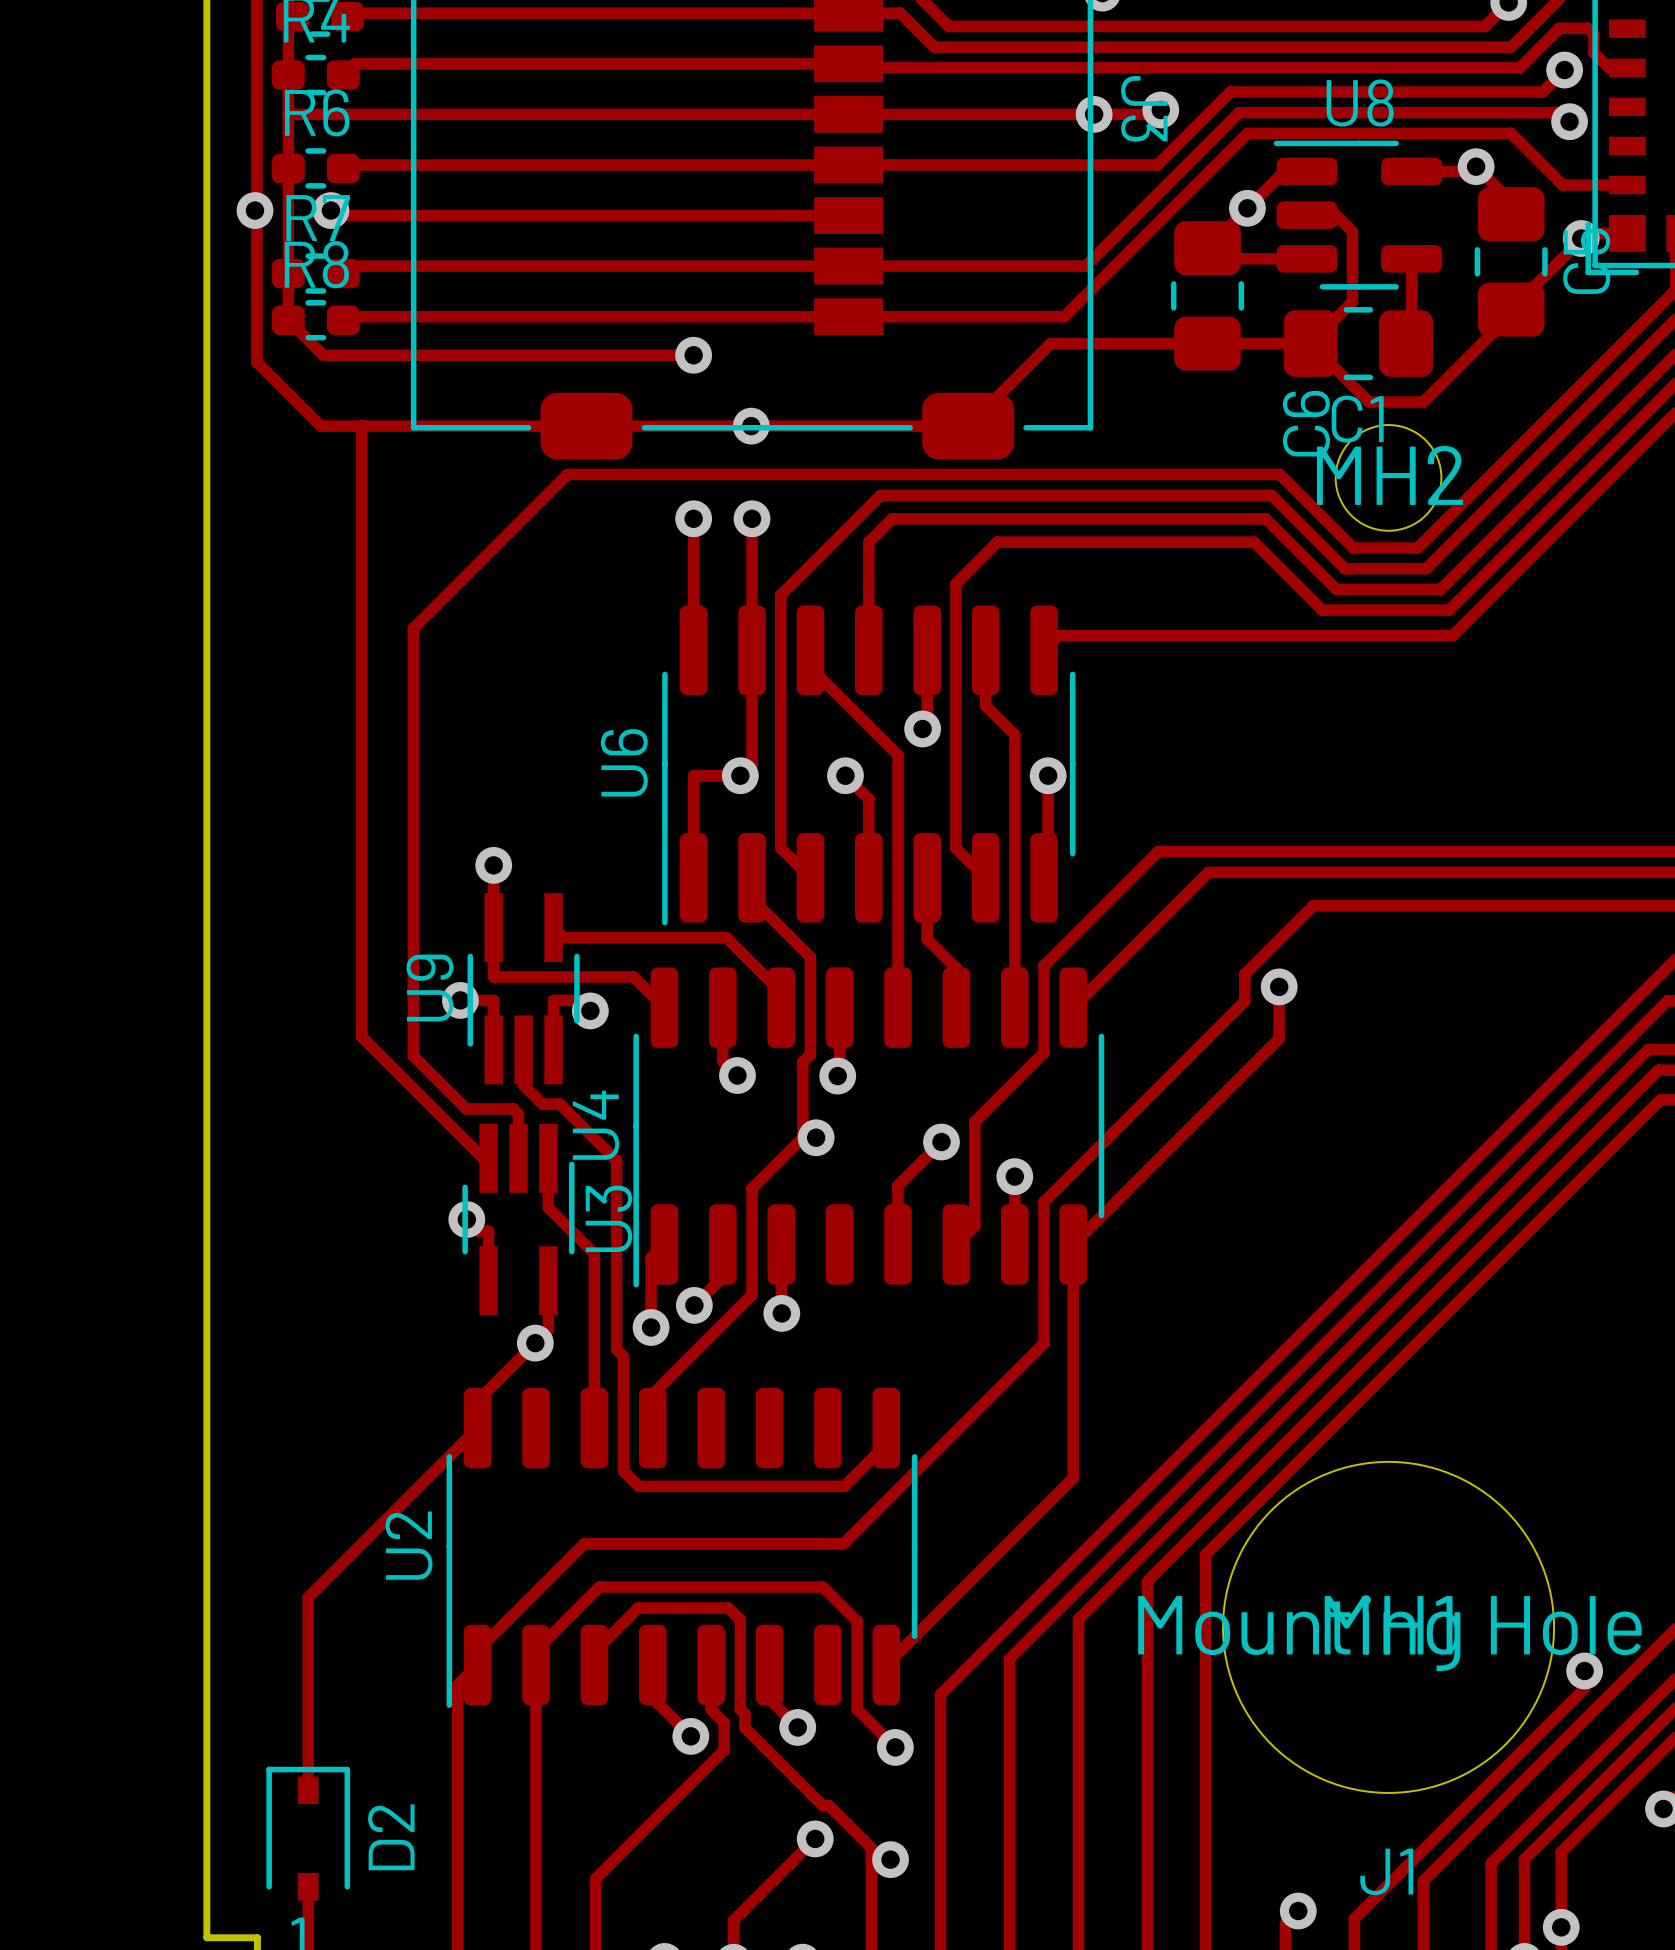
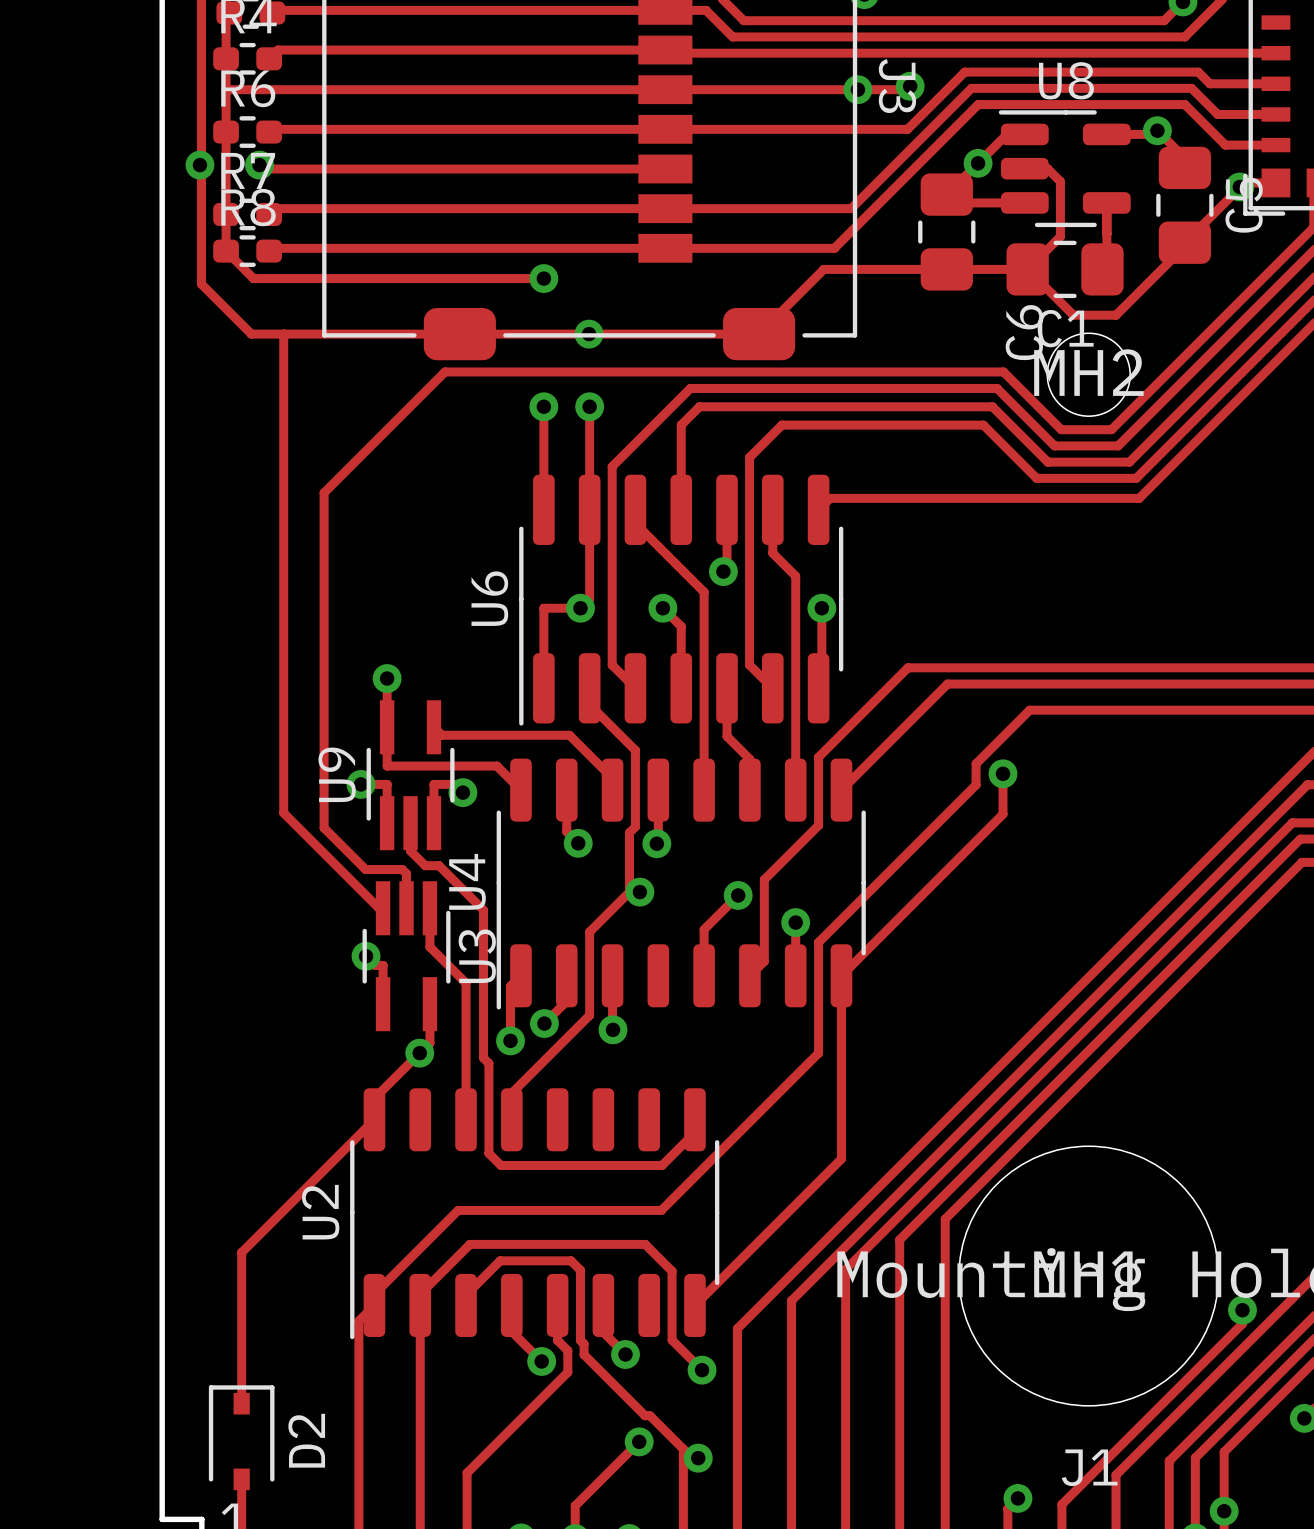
track: (1519, 67) (1559, 28) (1587, 28) (1593, 34) (1593, 52) (1608, 67) -> (1191, 53) (1261, 53)
track: (1564, 70) (1542, 91) (1528, 91) -> (1275, 83) (1210, 83) (1198, 72)
via: (1564, 70) -> none
track: (1519, 112) (1560, 112) (1569, 121) -> (1191, 88) (1217, 114) (1275, 114)
via: (1569, 121) -> none

